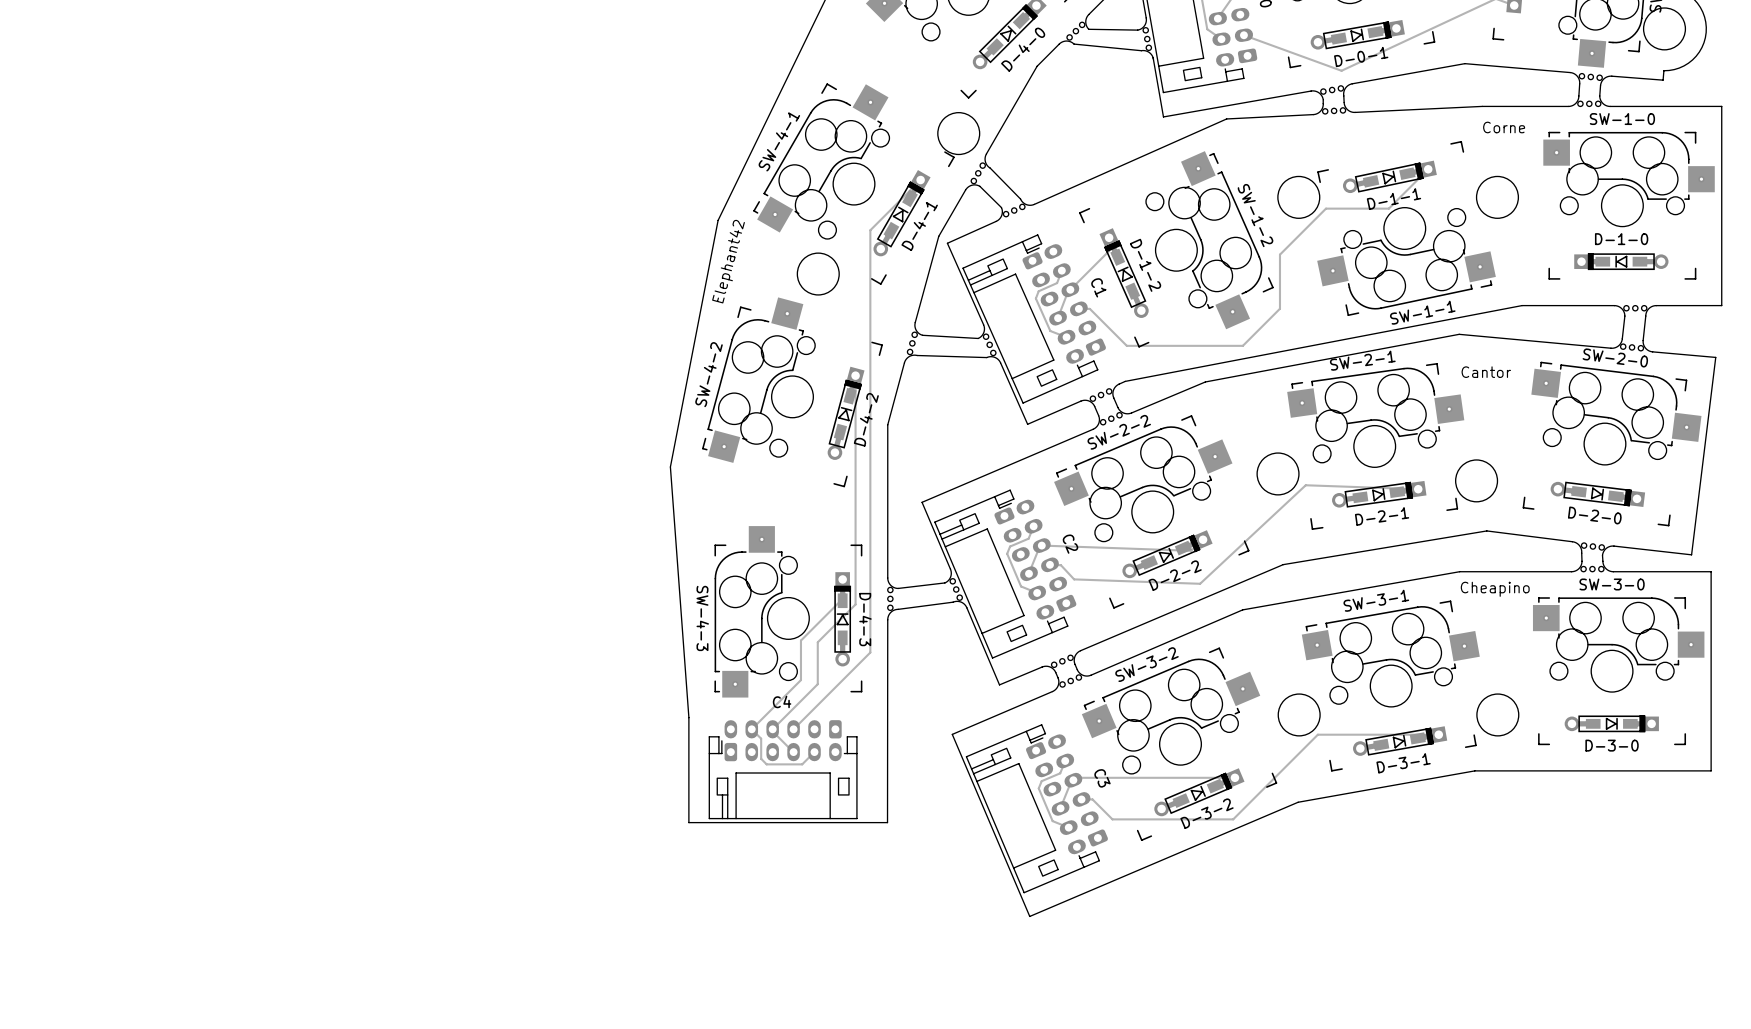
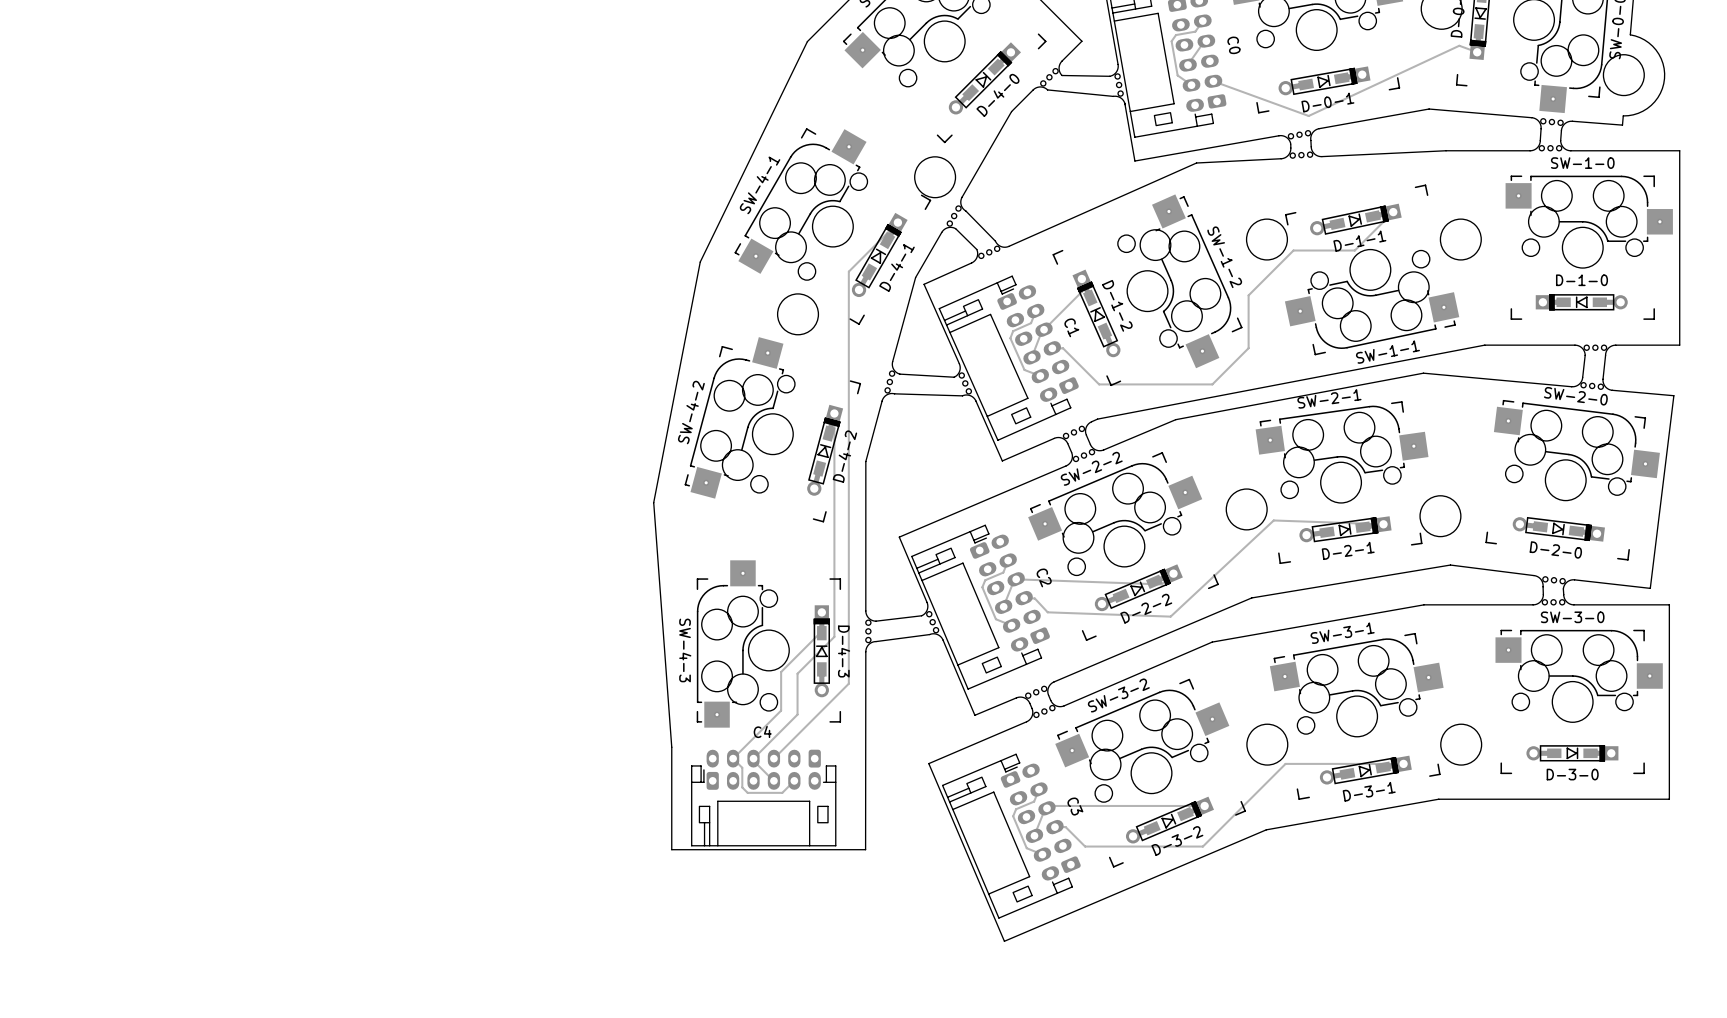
text: Corne (1504, 127) -> none
text: Elephant42 (728, 261) -> none
text: Cantor (1486, 372) -> none
text: Cheapino (1495, 589) -> none

